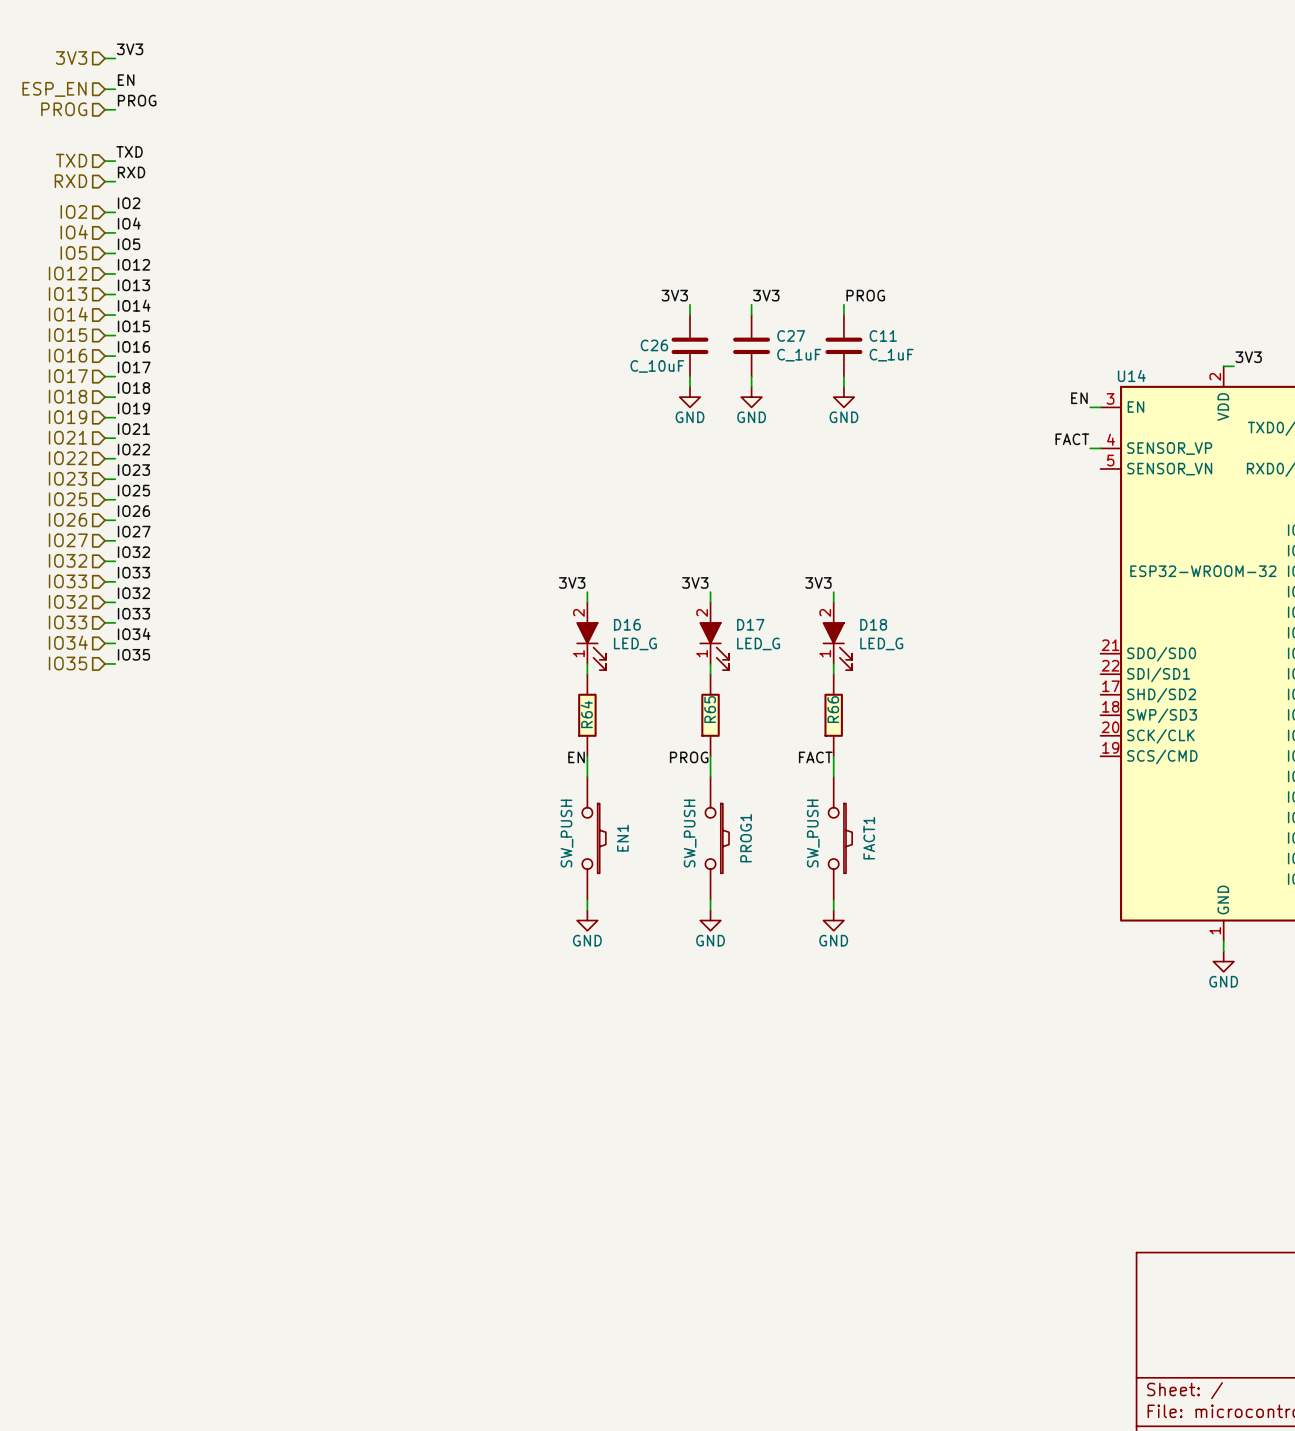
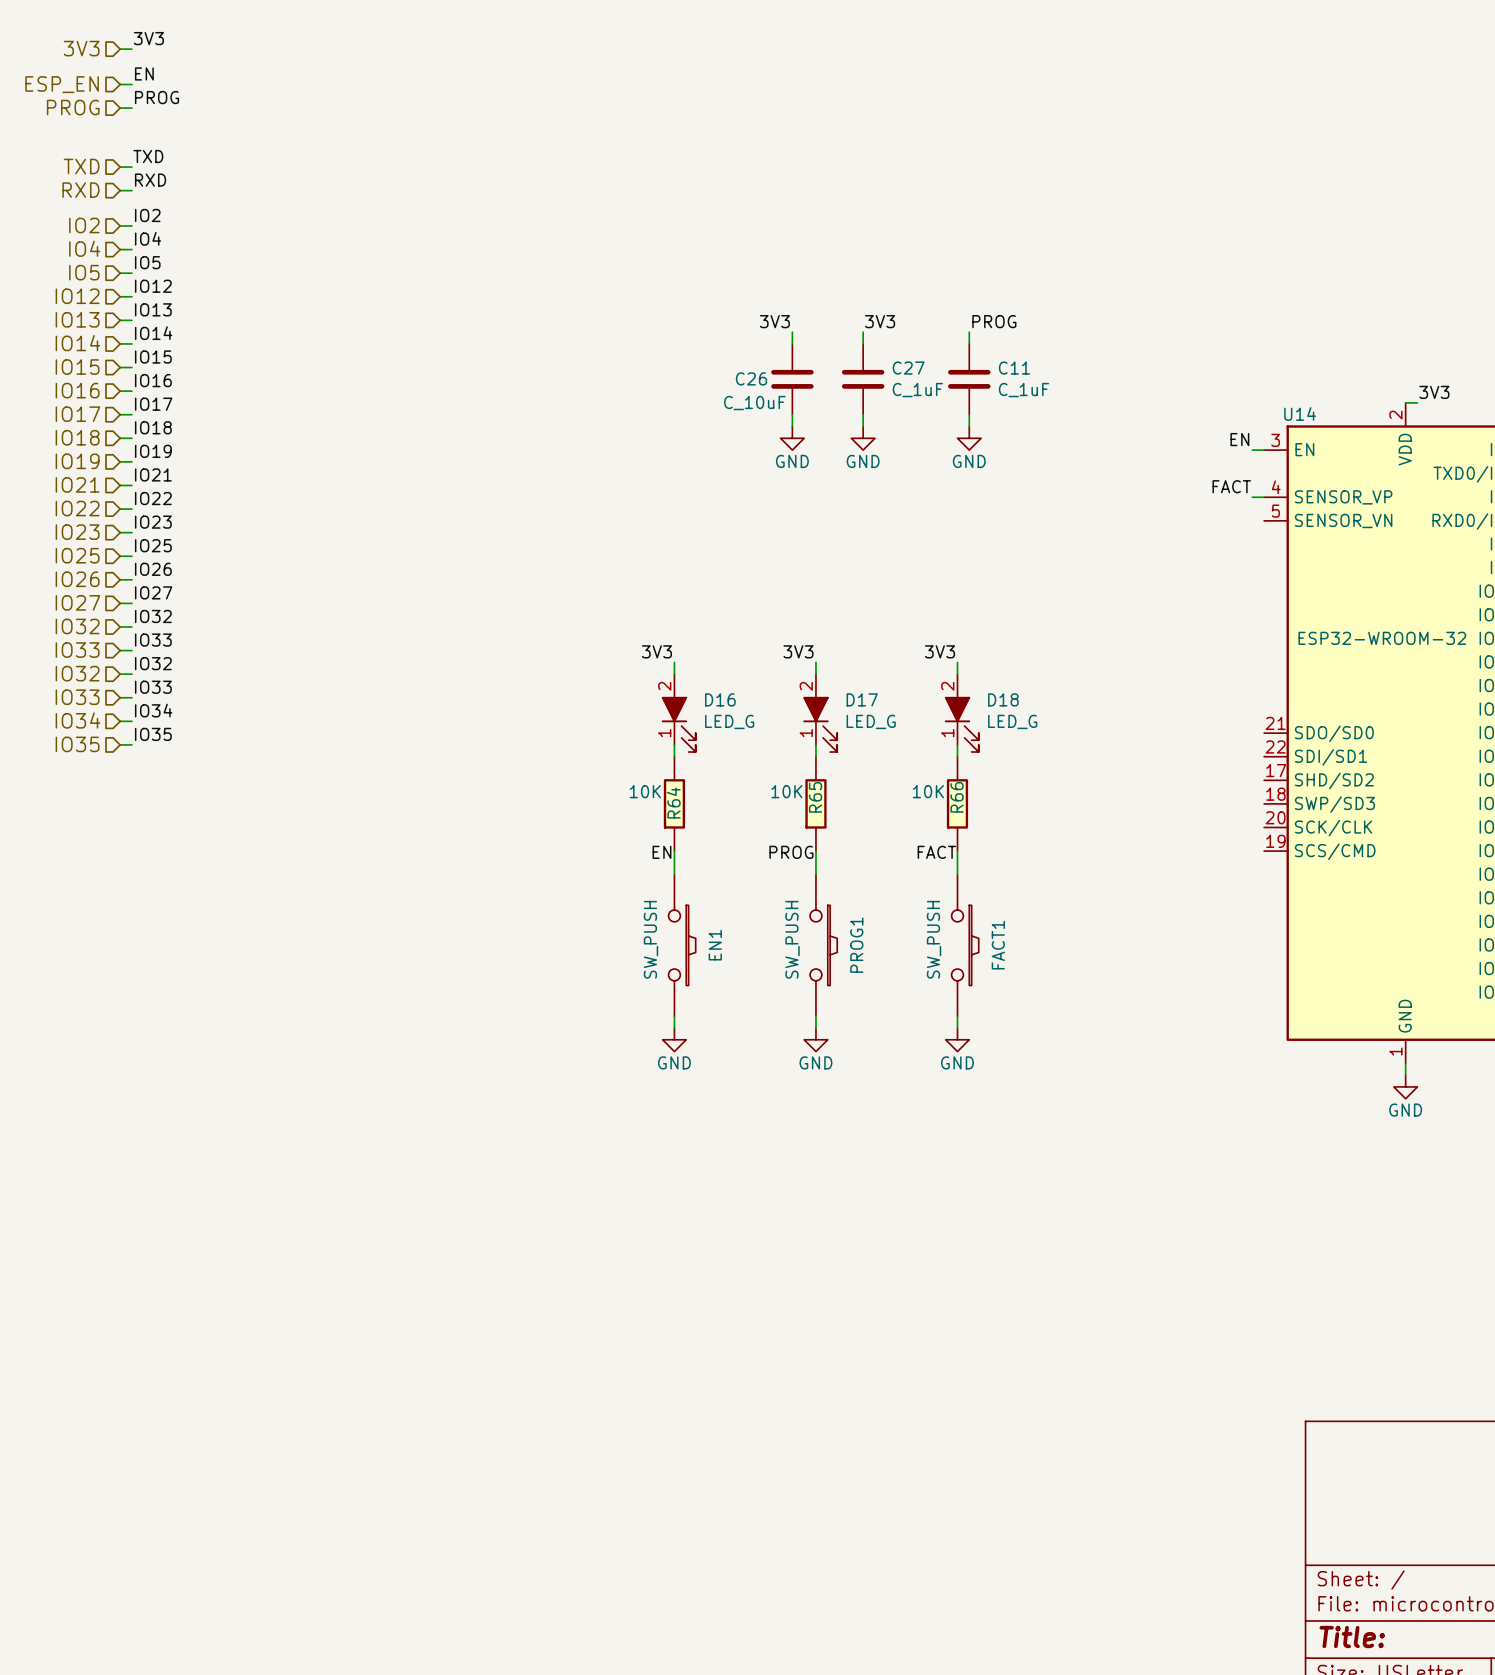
R64 value: none -> 10K (645, 791)
R65 value: none -> 10K (786, 791)
R66 value: none -> 10K (928, 791)

